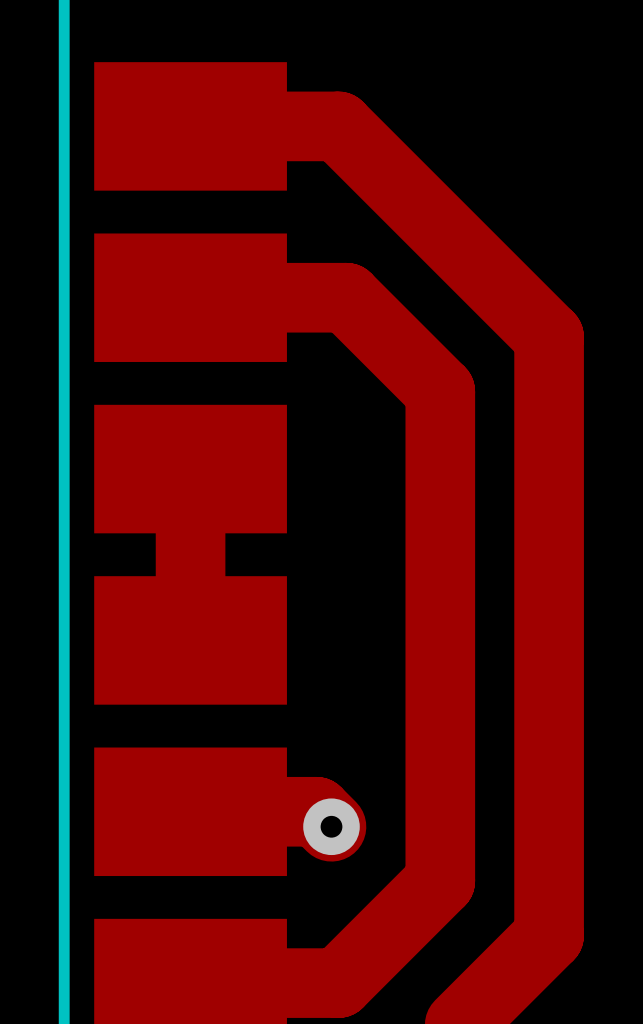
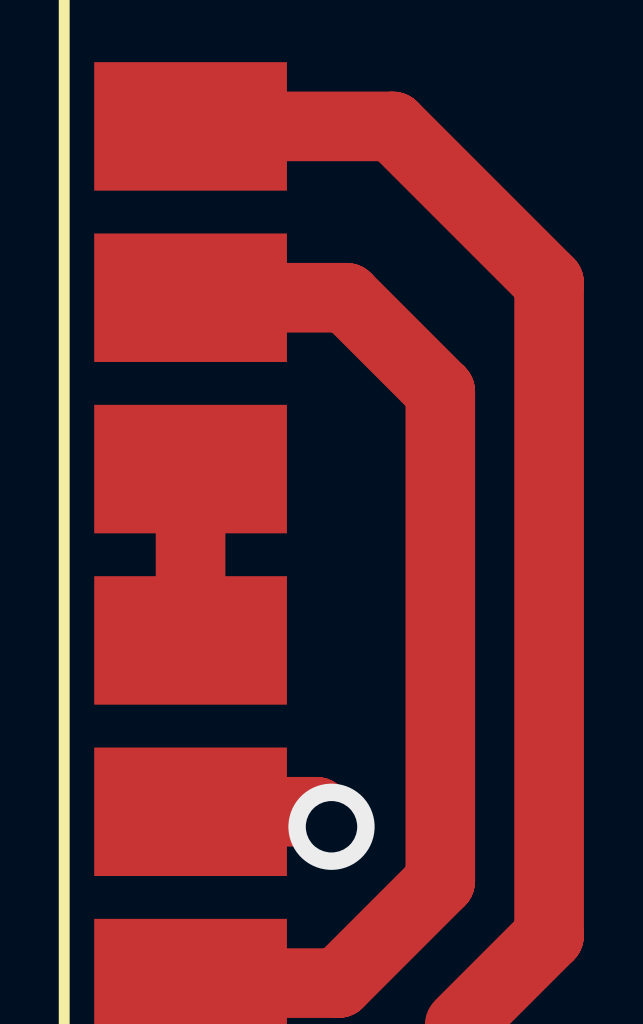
track: (338, 126) (549, 337) -> (338, 126) (392, 126) (549, 282) (549, 337)
via size: [303, 798, 360, 856] -> [288, 783, 375, 870]

